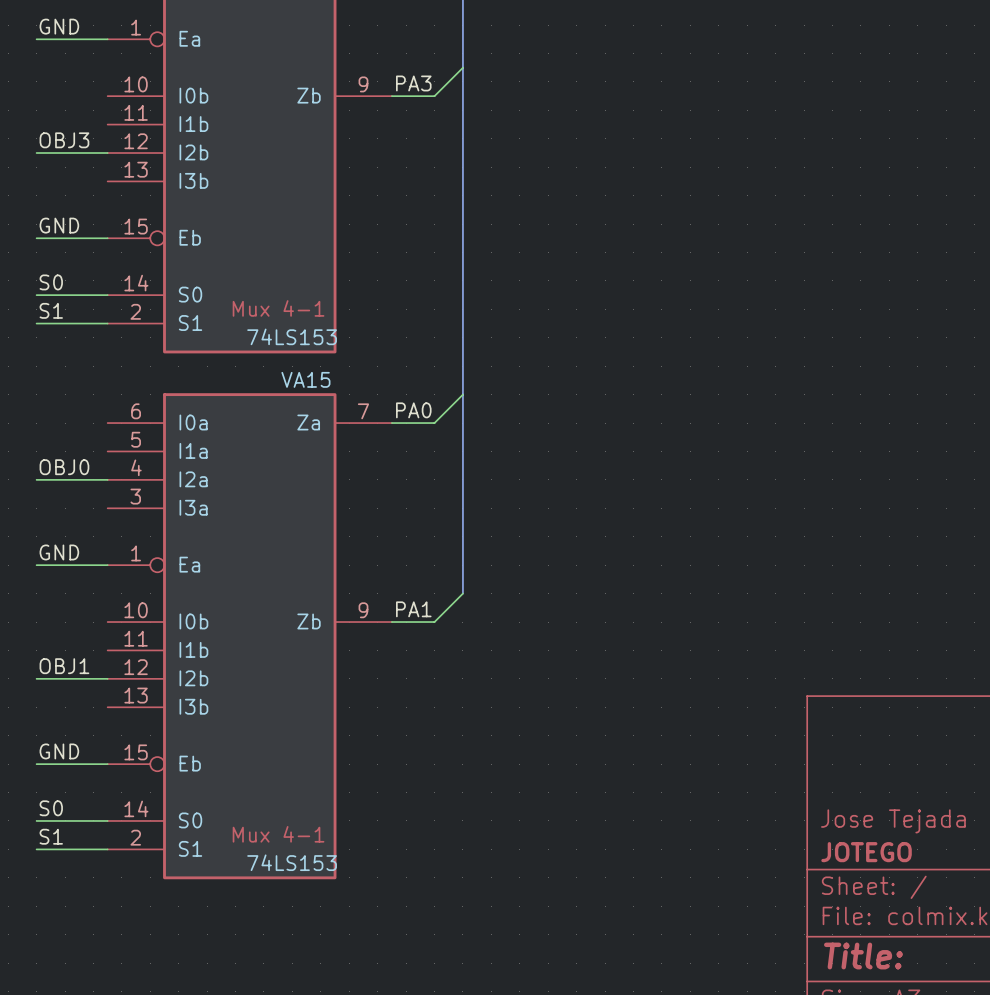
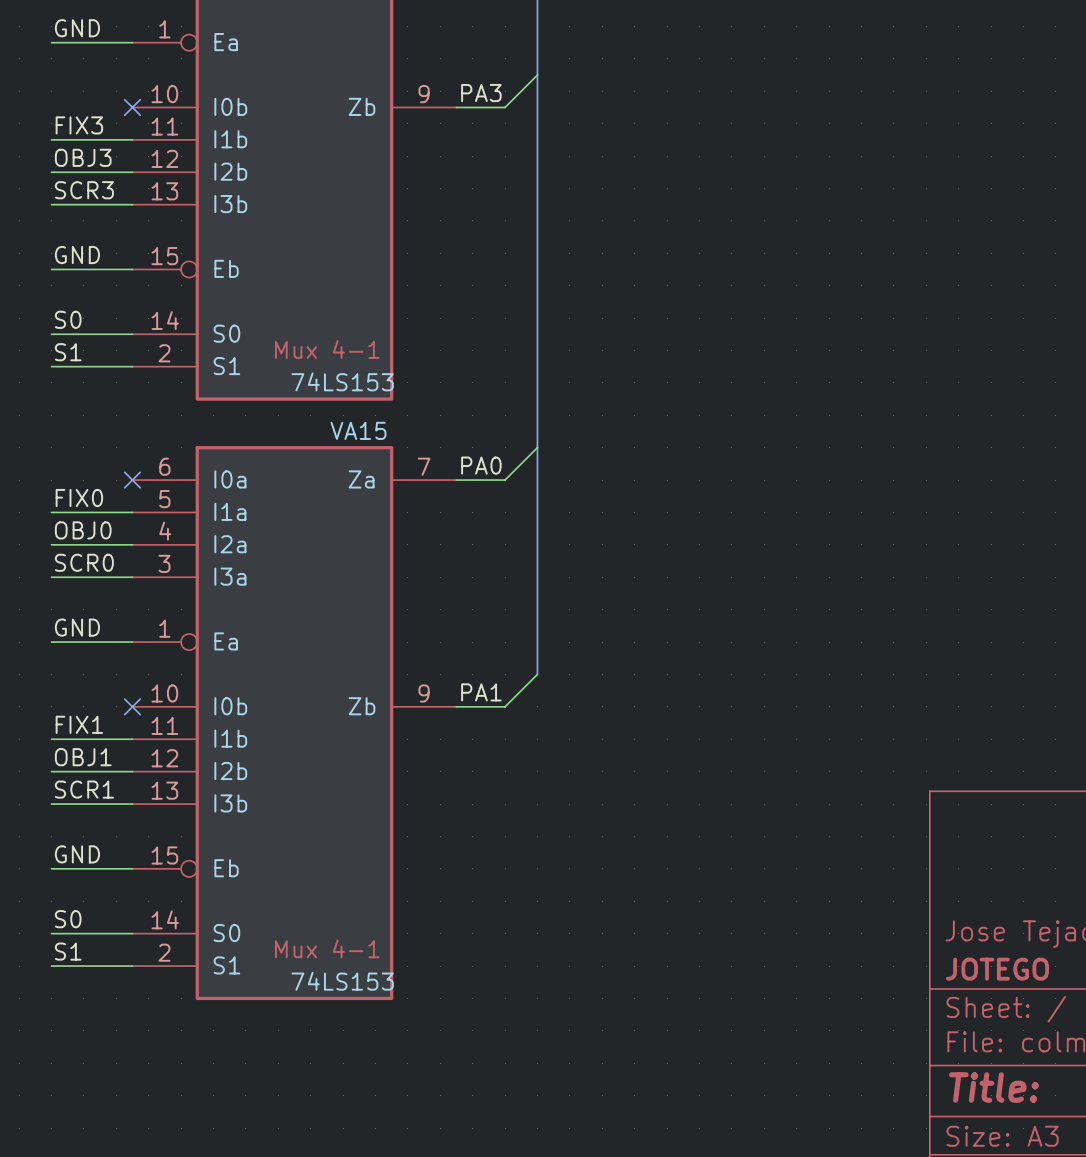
no-connect mark: none -> (132, 107)
label: none -> FIX3 (79, 125)
wire: none -> (51, 139) (132, 139)
label: none -> SCR3 (84, 190)
wire: none -> (51, 204) (132, 204)
no-connect mark: none -> (132, 480)
label: none -> FIX0 (79, 498)
wire: none -> (51, 512) (132, 512)
label: none -> SCR0 (84, 562)
wire: none -> (51, 577) (132, 577)
no-connect mark: none -> (132, 706)
label: none -> FIX1 (79, 724)
wire: none -> (51, 739) (132, 739)
label: none -> SCR1 (84, 789)
wire: none -> (51, 804) (132, 804)

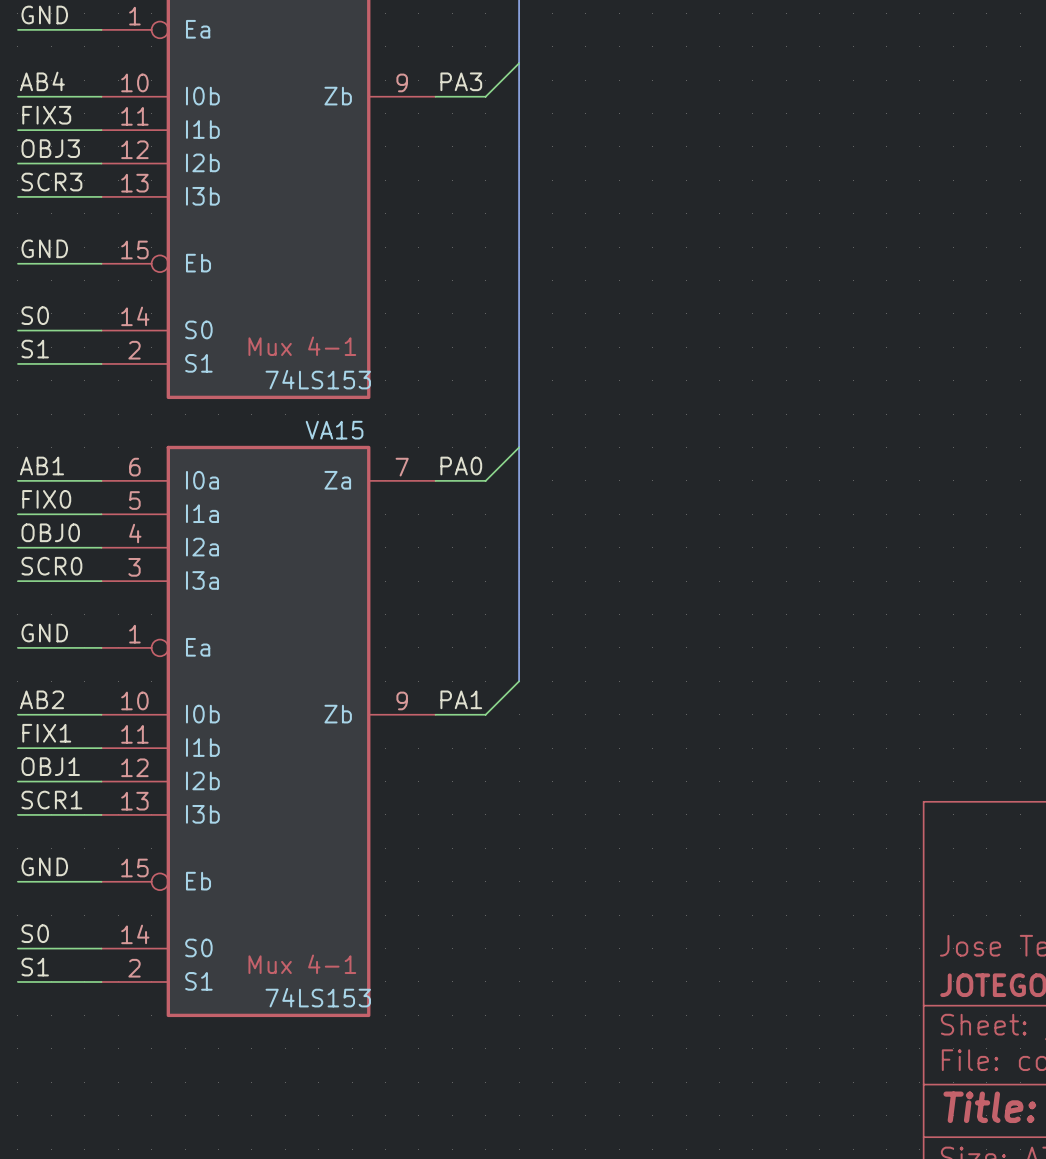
label: none -> AB4 (42, 81)
wire: none -> (17, 96) (101, 96)
no-connect mark: (132, 107) -> none
label: none -> AB1 (41, 465)
wire: none -> (17, 480) (101, 480)
no-connect mark: (132, 480) -> none
label: none -> AB2 (41, 699)
wire: none -> (17, 714) (101, 714)
no-connect mark: (132, 706) -> none

